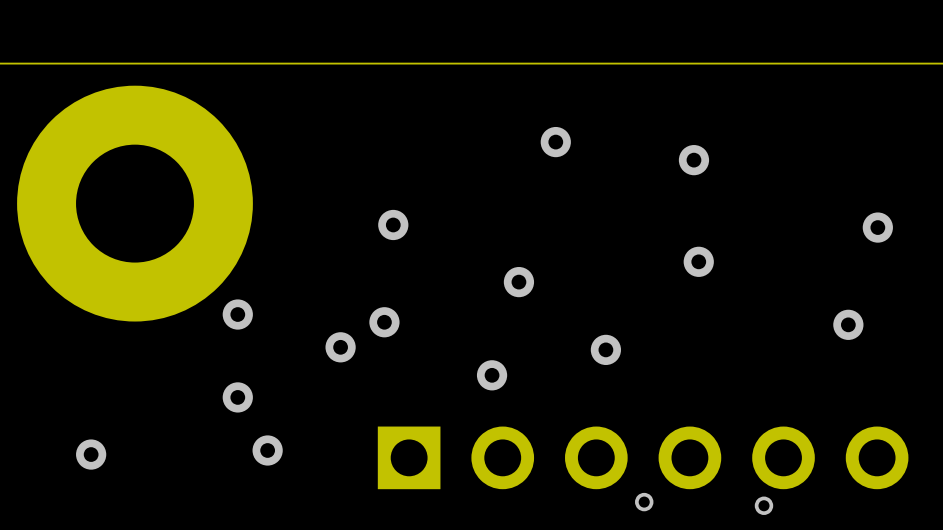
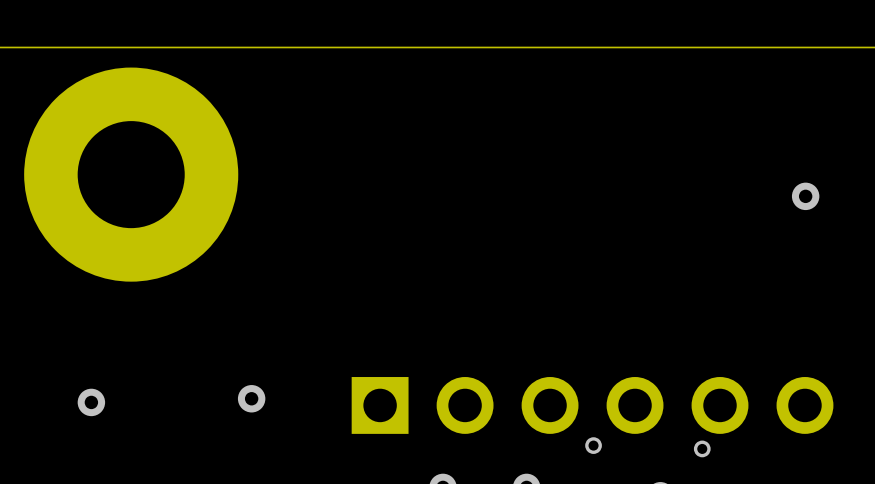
via: (555, 142) -> none
via: (693, 160) -> none
via: (393, 224) -> none
via: (698, 261) -> none
via: (518, 282) -> none
via: (237, 314) -> none
via: (384, 322) -> none
via: (848, 324) -> none
via: (340, 347) -> none
via: (605, 349) -> none
via: (492, 375) -> none
via: (237, 397) -> none

